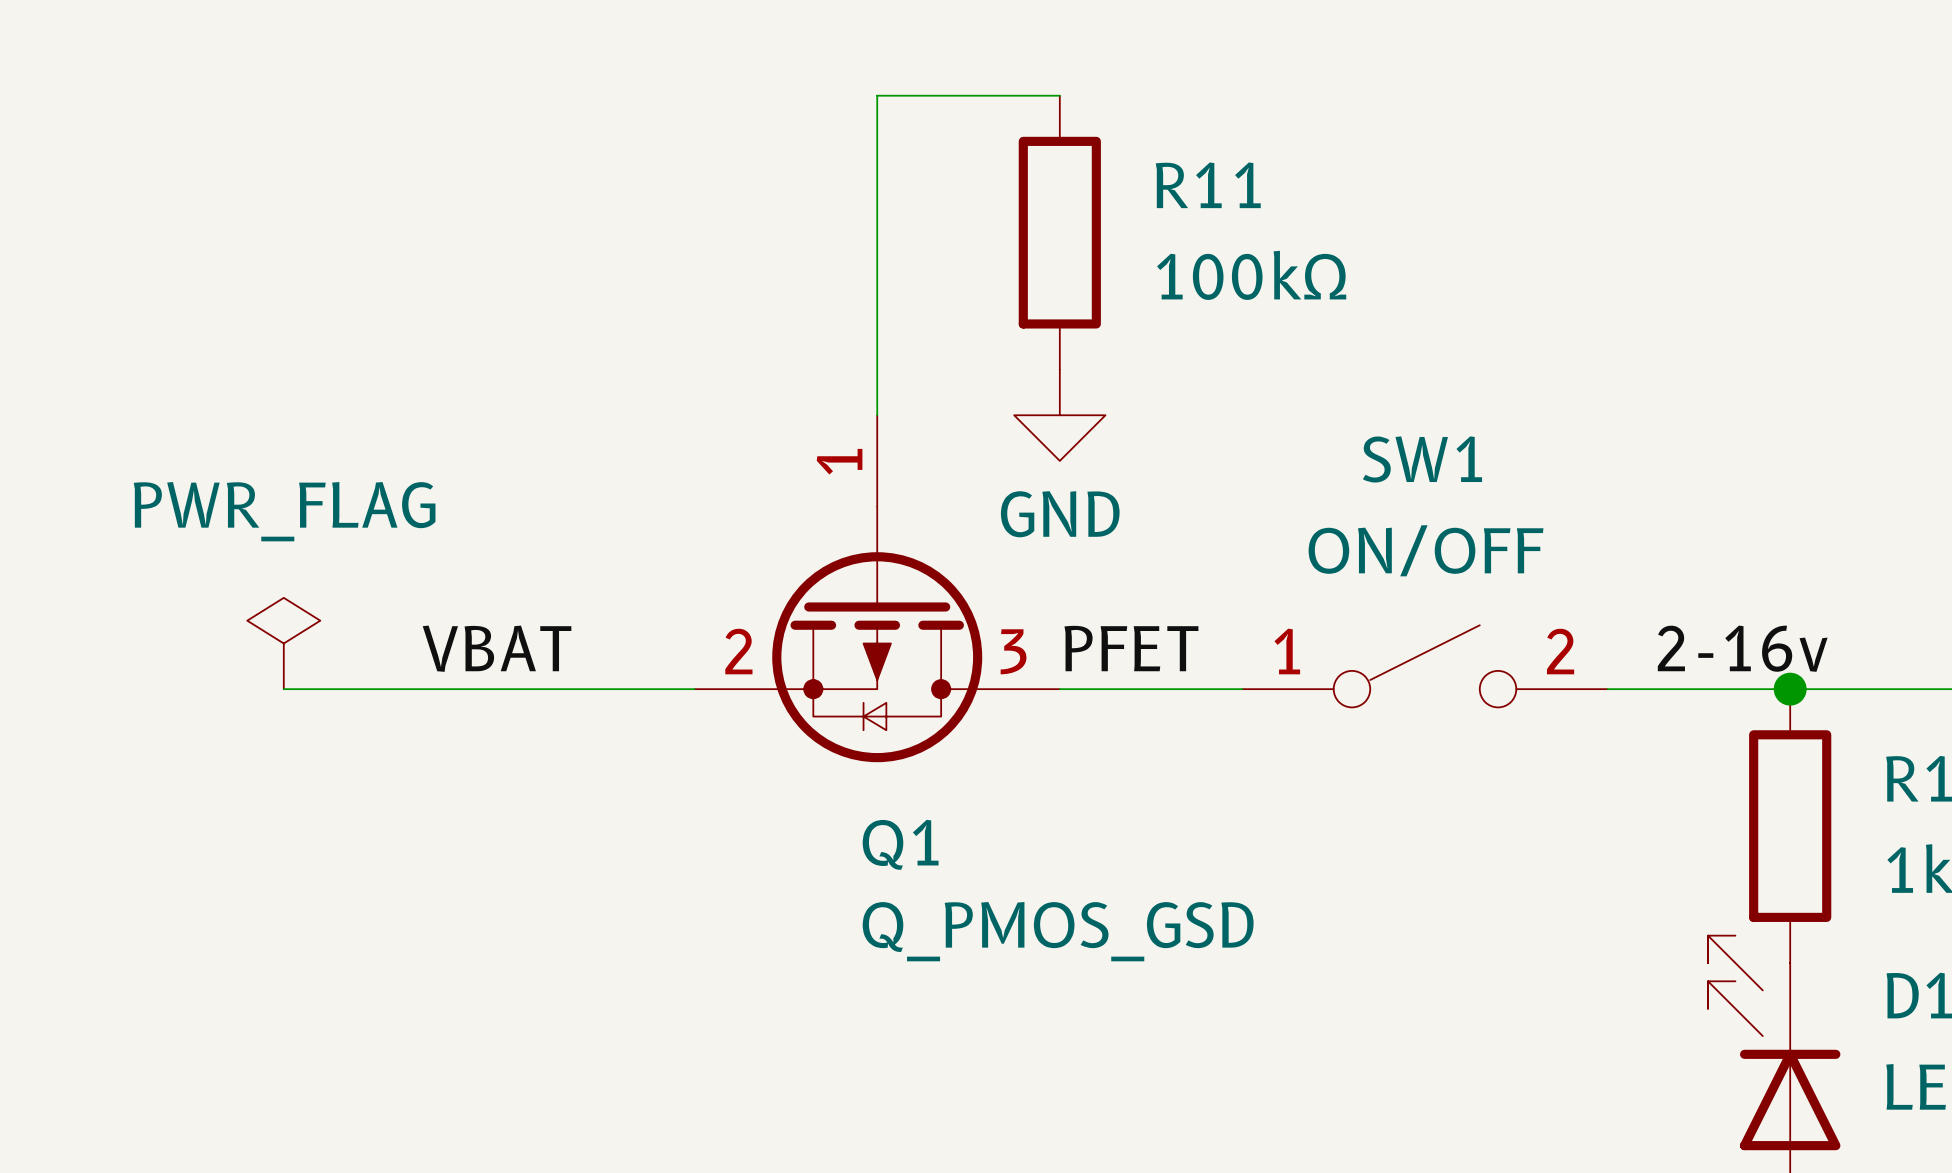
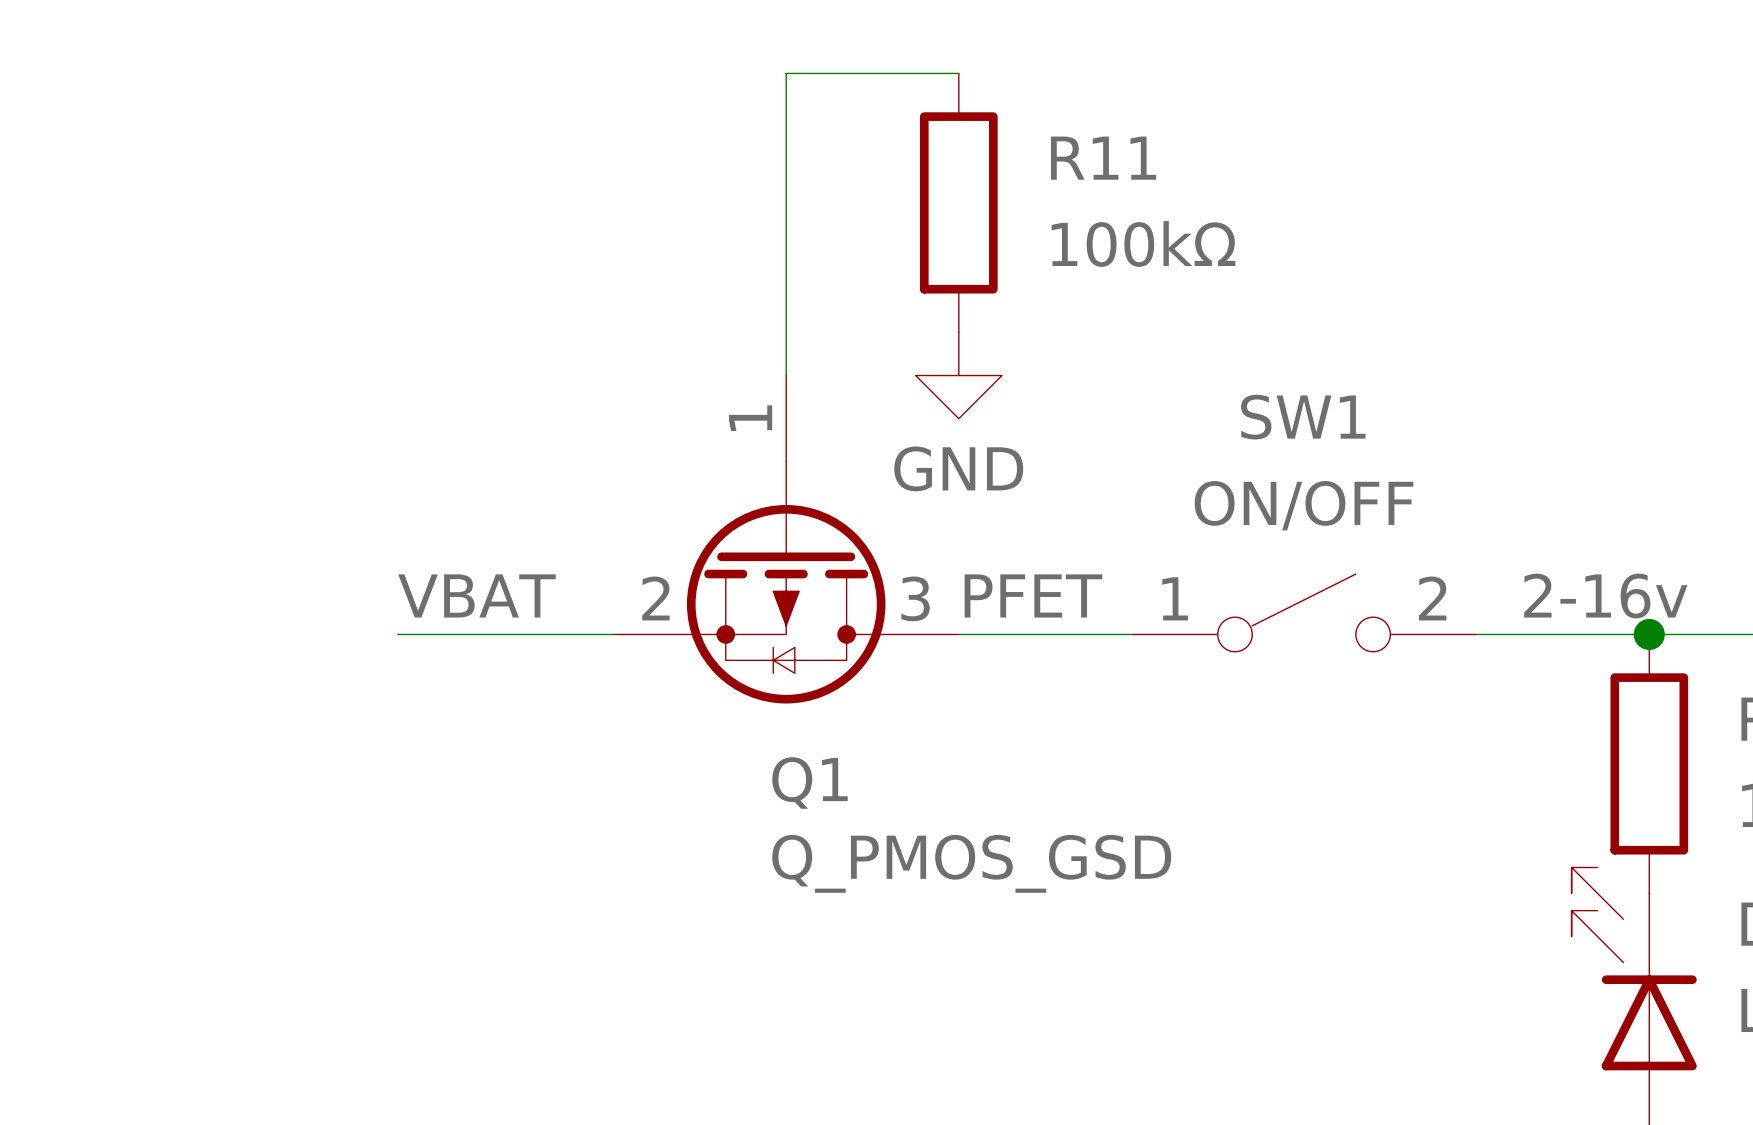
power symbol: PWR_FLAG (283, 643) -> none
label position: VBAT (497, 648) -> VBAT (477, 595)
wire: (283, 689) (466, 689) -> none

